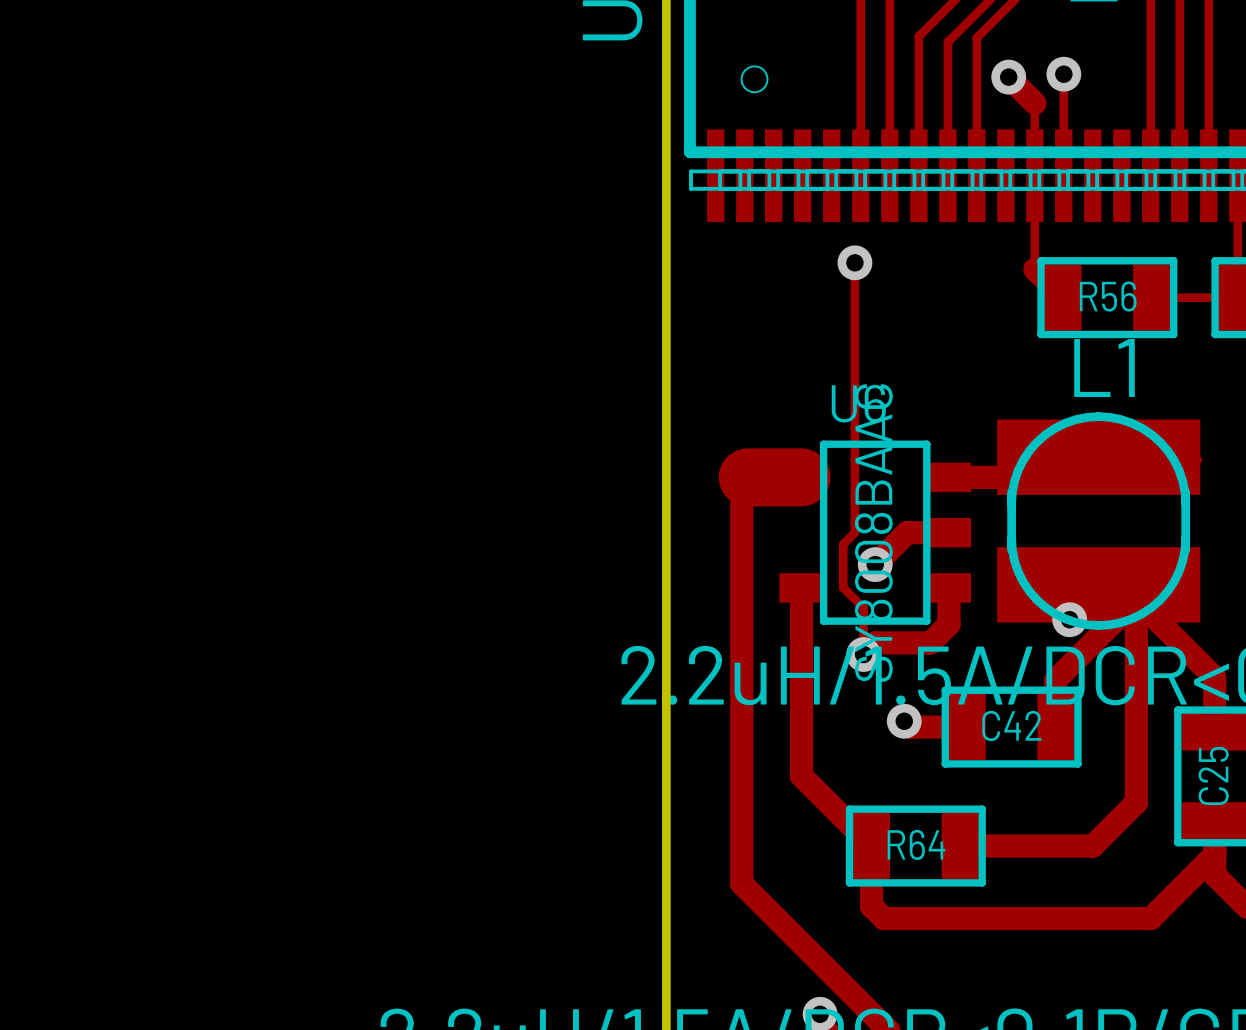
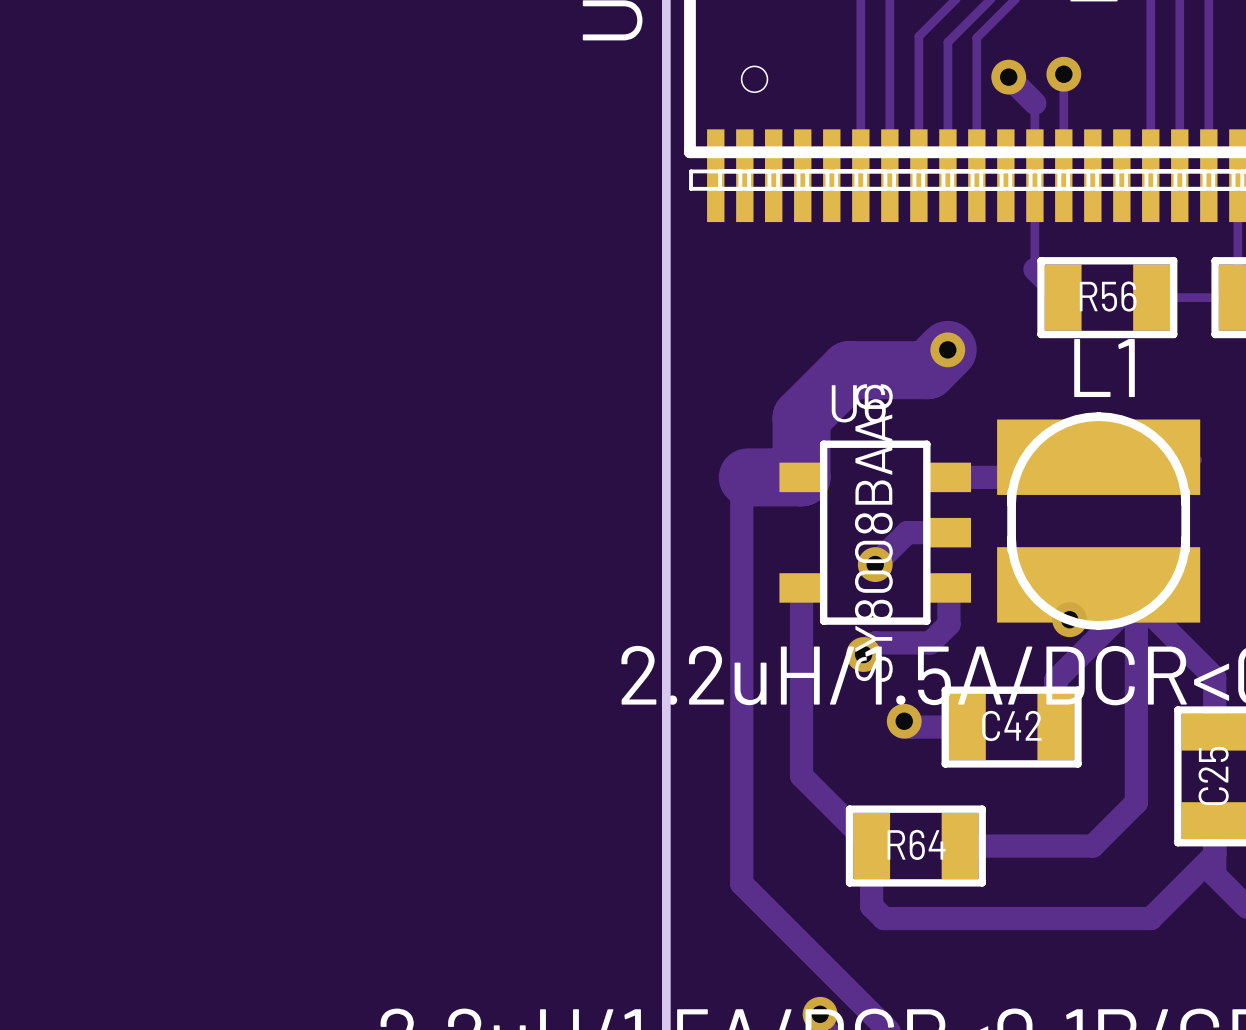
track: (854, 262) (854, 532) (843, 544) (843, 587) (863, 608) (863, 654) -> none
via position: (854, 262) -> (947, 349)
track: none -> (947, 349) (927, 370) (849, 370) (801, 417) (801, 477)

